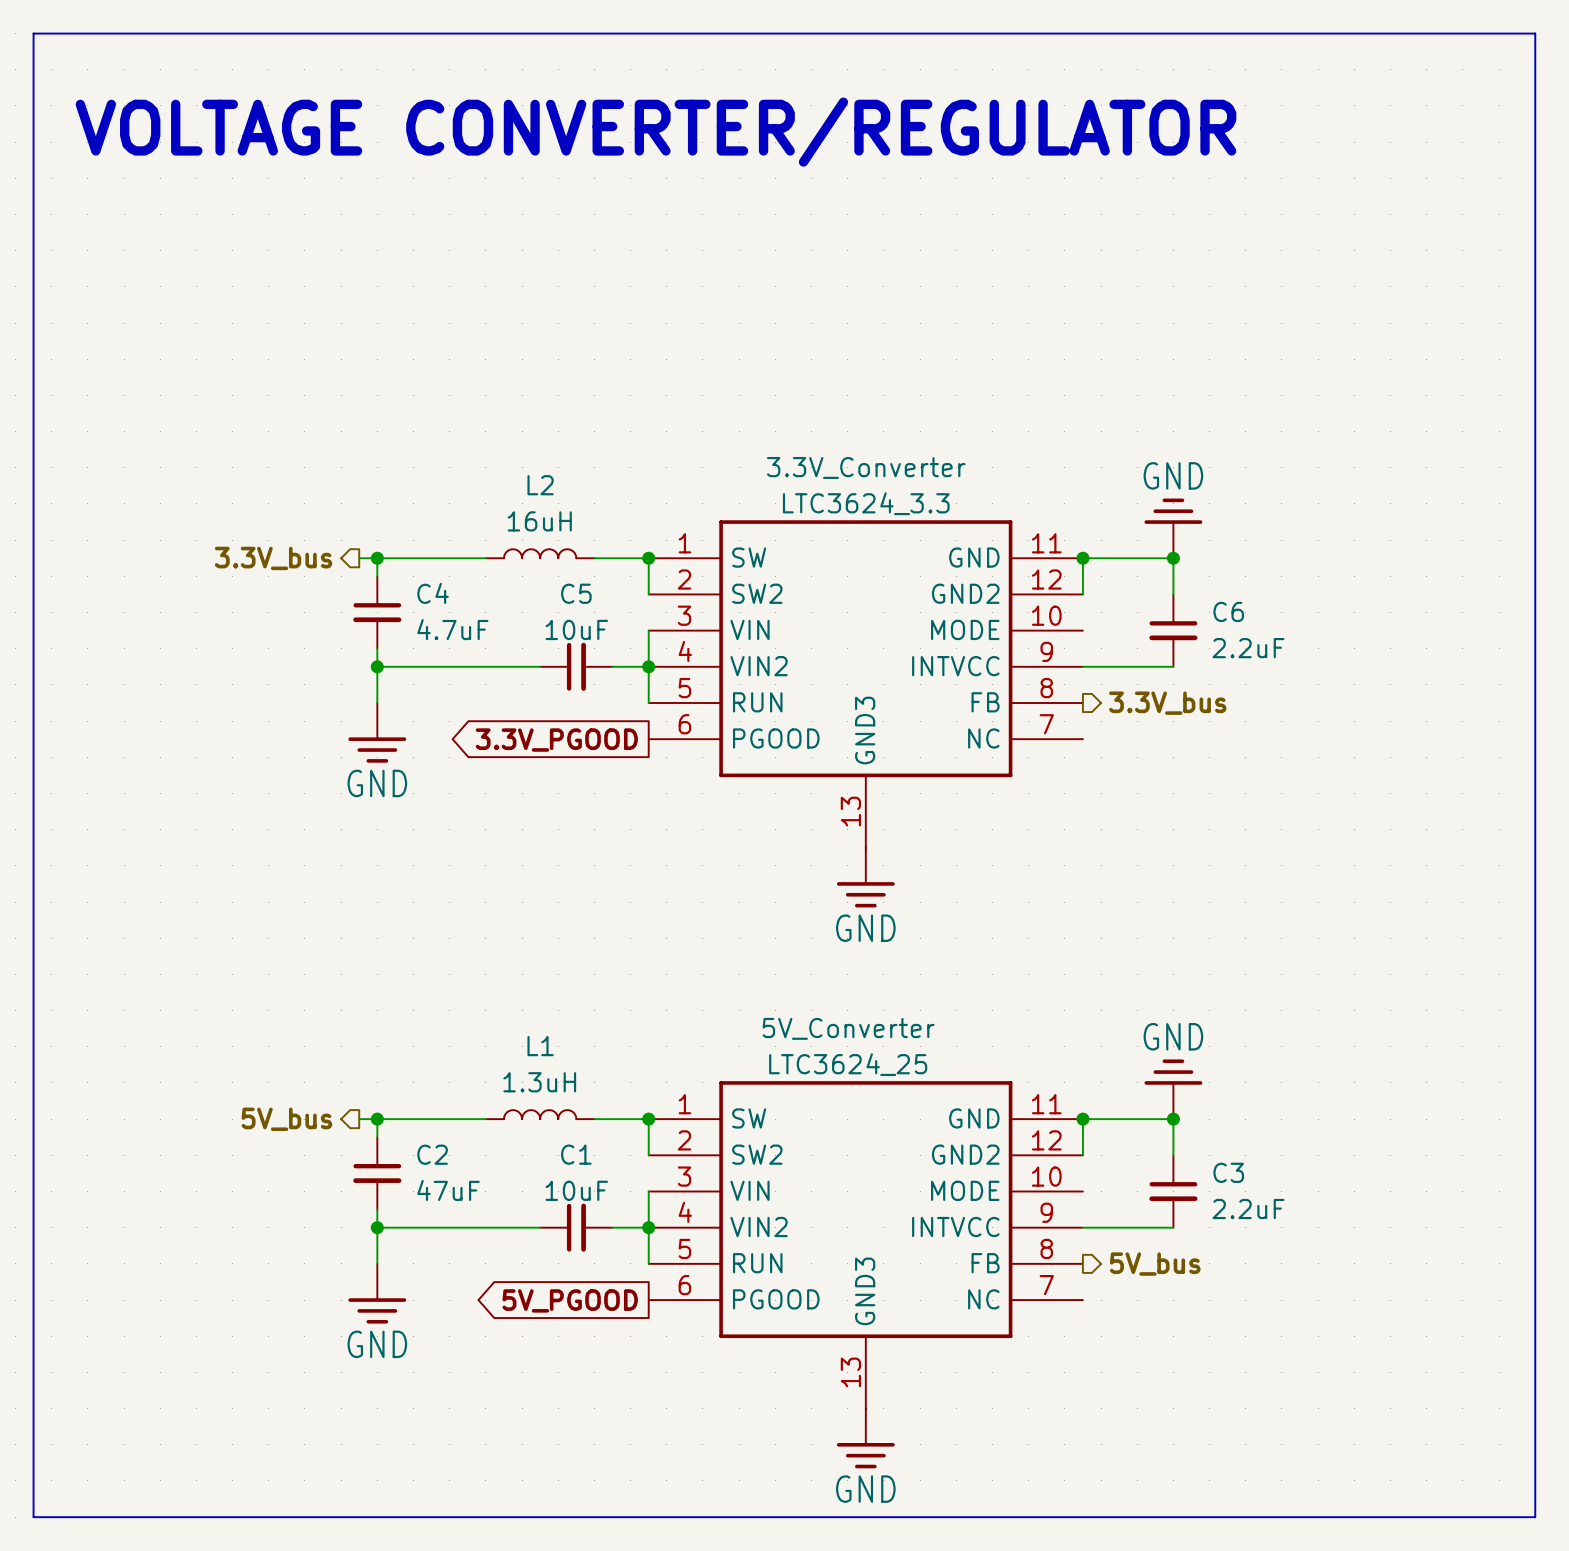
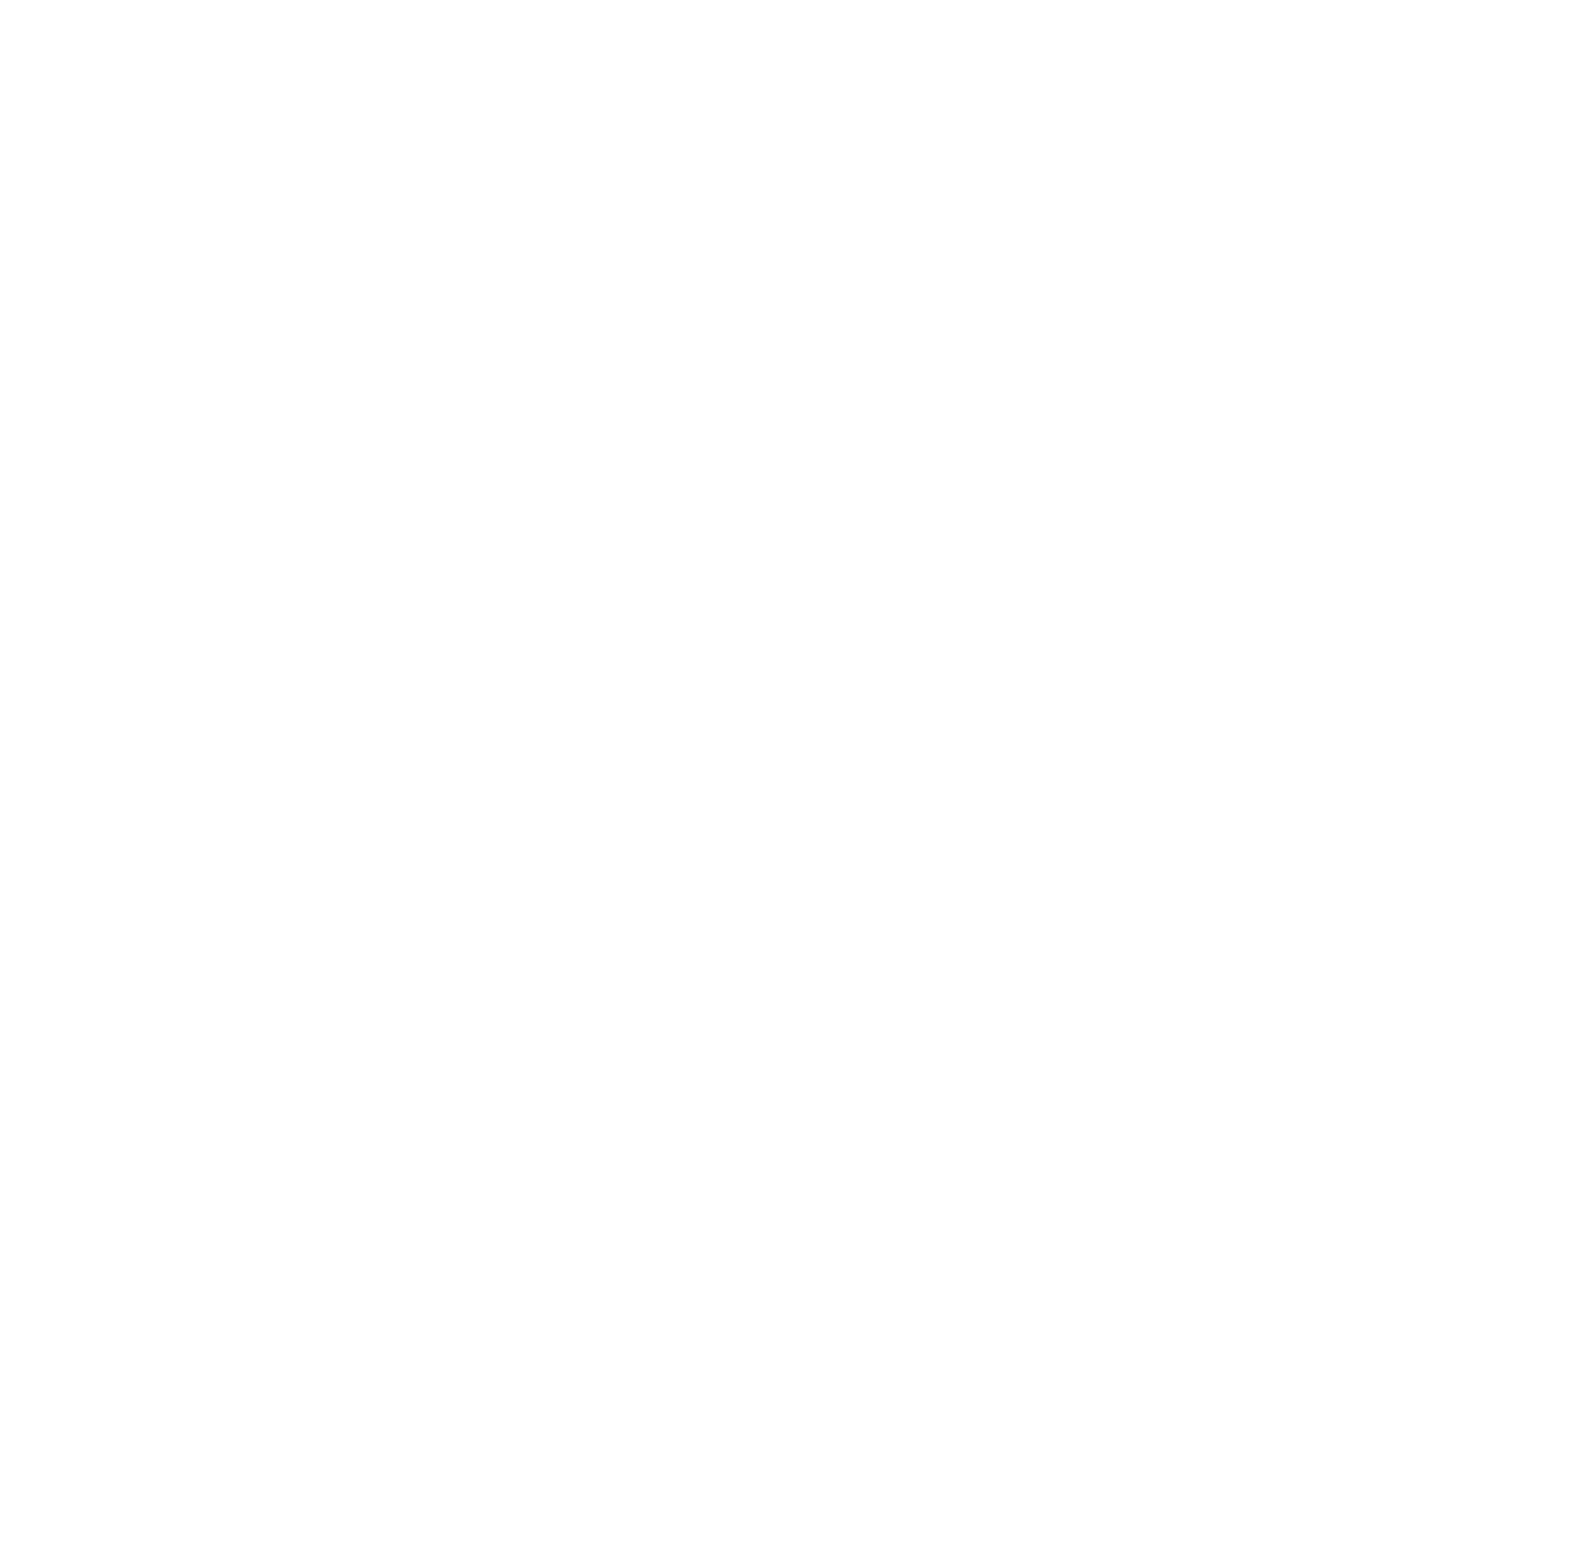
line: (33, 33) (1535, 33) (1535, 1517) (33, 1517) (33, 33) -> none
text: VOLTAGE CONVERTER/REGULATOR (655, 132) -> none
power symbol: GND (1173, 528) -> none
L2: 16uH (540, 553) -> none
hierarchical label: 3.3V_bus (273, 558) -> none
wire: (359, 558) (485, 558) -> none
wire: (377, 558) (377, 576) -> none
junction: (377, 558) -> none
wire: (594, 558) (648, 558) (648, 594) -> none
junction: (648, 558) -> none
junction: (1082, 558) -> none
junction: (1173, 558) -> none
wire: (1082, 594) (1082, 558) (1173, 558) (1173, 594) -> none
C4: 4.7uF (377, 612) -> none
wire: (648, 630) (648, 702) -> none
C6: 2.2uF (1173, 630) -> none
wire: (377, 648) (377, 702) -> none
wire: (377, 666) (540, 666) -> none
junction: (377, 666) -> none
C5: 10uF (576, 666) -> none
wire: (612, 666) (648, 666) -> none
junction: (648, 666) -> none
wire: (1082, 666) (1173, 666) -> none
3.3V_Converter: LTC3624_3.3 (865, 684) -> none
hierarchical label: 3.3V_bus (1167, 703) -> none
power symbol: GND (377, 732) -> none
global label: 3.3V_PGOOD (556, 740) -> none
power symbol: GND (865, 877) -> none
power symbol: GND (1173, 1089) -> none
L1: 1.3uH (540, 1114) -> none
hierarchical label: 5V_bus (286, 1119) -> none
wire: (359, 1119) (485, 1119) -> none
wire: (377, 1119) (377, 1137) -> none
junction: (377, 1119) -> none
wire: (594, 1119) (648, 1119) (648, 1155) -> none
junction: (648, 1119) -> none
junction: (1082, 1119) -> none
junction: (1173, 1119) -> none
wire: (1082, 1155) (1082, 1119) (1173, 1119) (1173, 1155) -> none
C2: 47uF (377, 1173) -> none
wire: (648, 1191) (648, 1263) -> none
C3: 2.2uF (1173, 1191) -> none
wire: (377, 1209) (377, 1263) -> none
wire: (377, 1227) (540, 1227) -> none
junction: (377, 1227) -> none
C1: 10uF (576, 1227) -> none
wire: (612, 1227) (648, 1227) -> none
junction: (648, 1227) -> none
wire: (1082, 1227) (1173, 1227) -> none
5V_Converter: LTC3624_25 (865, 1244) -> none
hierarchical label: 5V_bus (1155, 1264) -> none
power symbol: GND (377, 1293) -> none
global label: 5V_PGOOD (570, 1300) -> none
power symbol: GND (865, 1438) -> none

